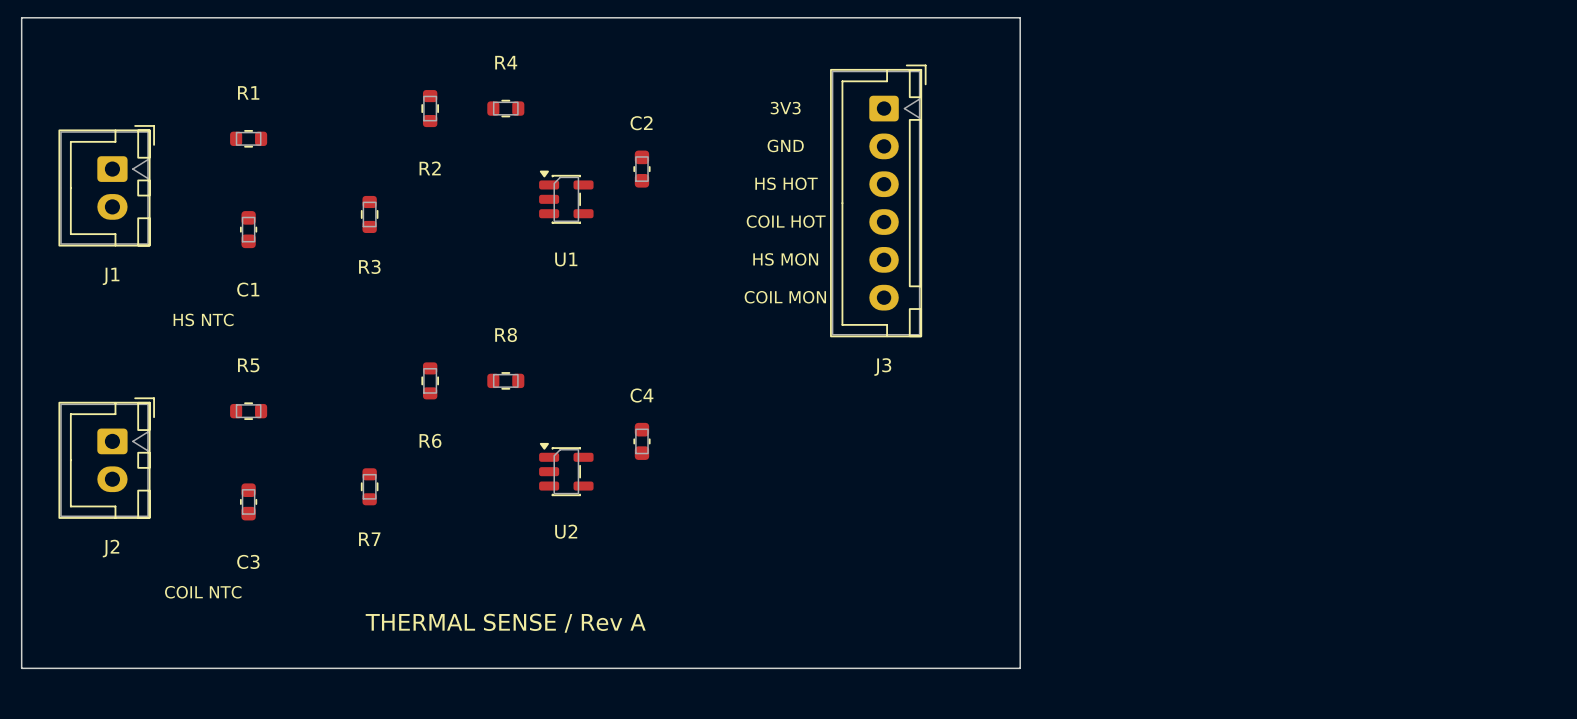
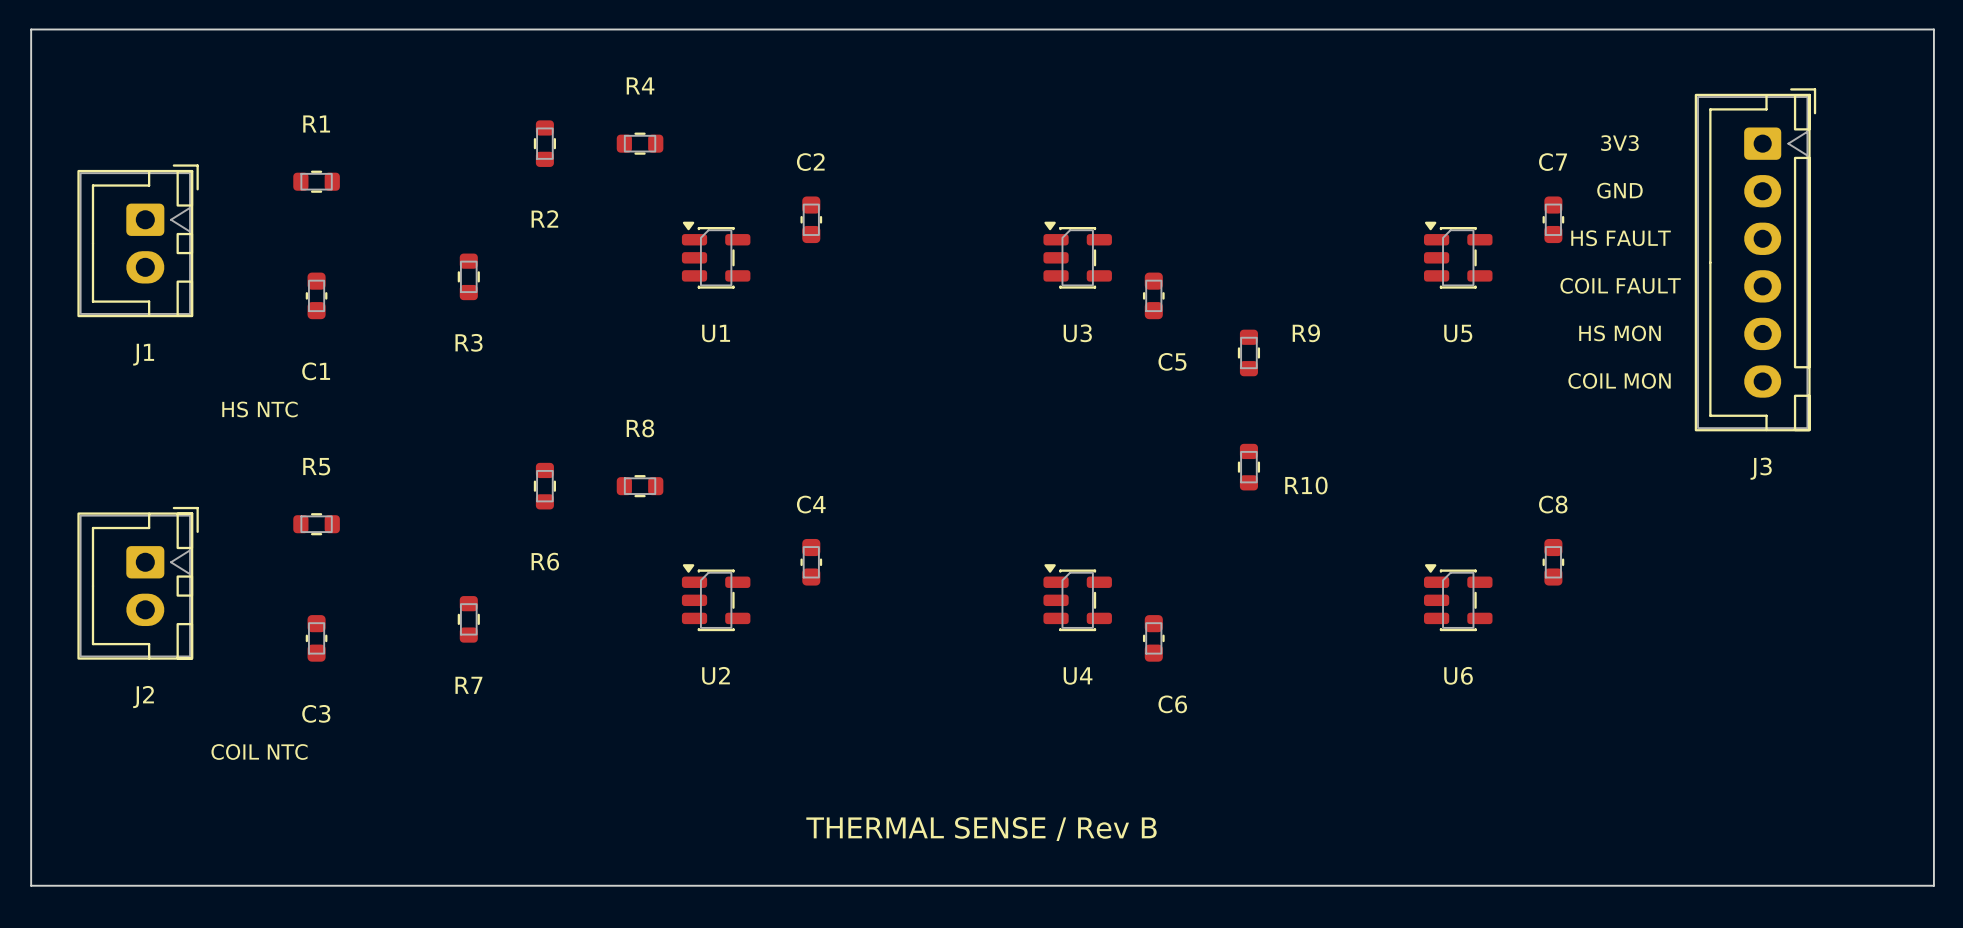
board edge: (1020, 17) (1020, 668) (21, 668) -> (1287, 29) (1933, 29) (1933, 885) (31, 885) (31, 847)
text: 3V3 (785, 108) -> none
text: none -> 3V3 (1619, 143)
text: GND (785, 145) -> none
text: none -> GND (1619, 190)
C7: none -> (1553, 219)
text: HS HOT (786, 183) -> none
text: none -> HS FAULT (1621, 238)
U3: none -> (1077, 255)
U5: none -> (1458, 255)
J3 position: (878, 200) -> (1755, 259)
text: COIL HOT (786, 221) -> none
text: none -> COIL FAULT (1620, 285)
C5: none -> (1153, 295)
text: HS MON (785, 259) -> none
text: none -> HS MON (1619, 333)
R9: none -> (1248, 352)
text: COIL MON (785, 297) -> none
text: none -> COIL MON (1619, 380)
R10: none -> (1248, 467)
C8: none -> (1553, 562)
U4: none -> (1077, 597)
U6: none -> (1458, 597)
C6: none -> (1153, 638)
text: THERMAL SENSE / Rev A (505, 623) -> THERMAL SENSE / Rev B (981, 829)

